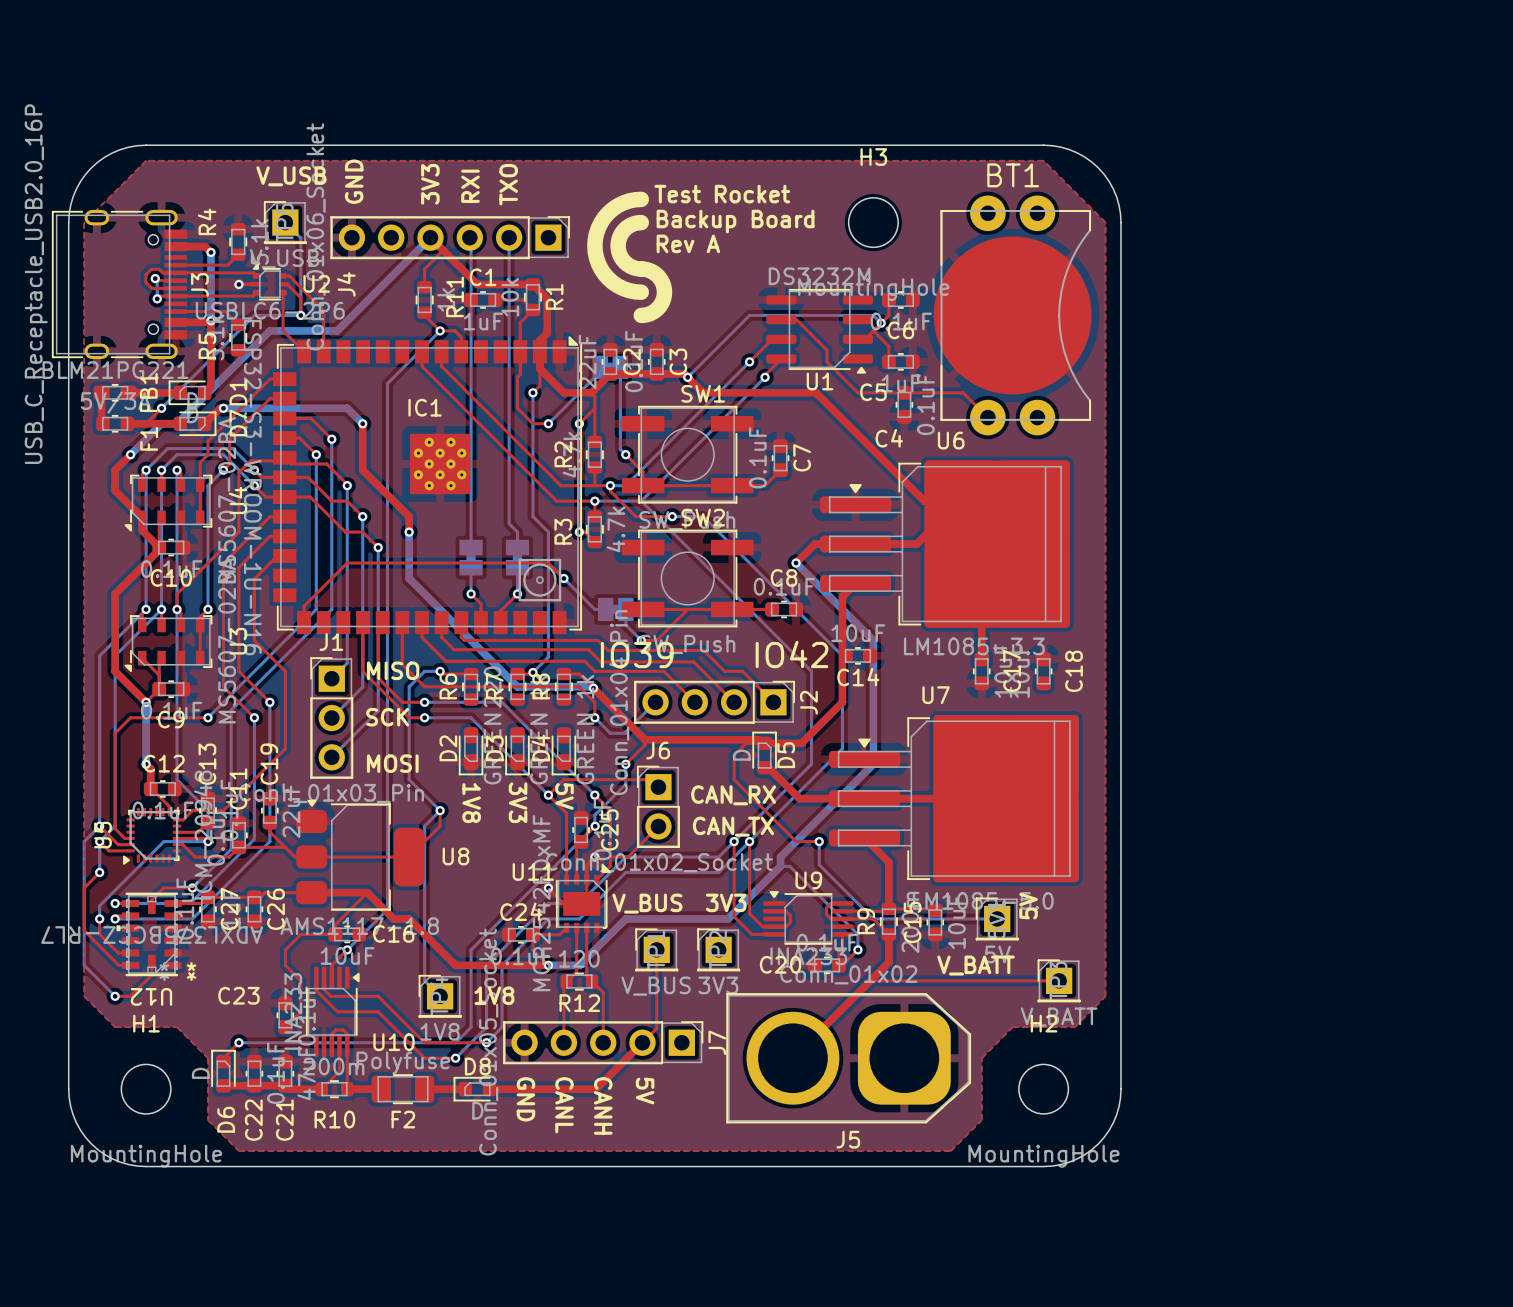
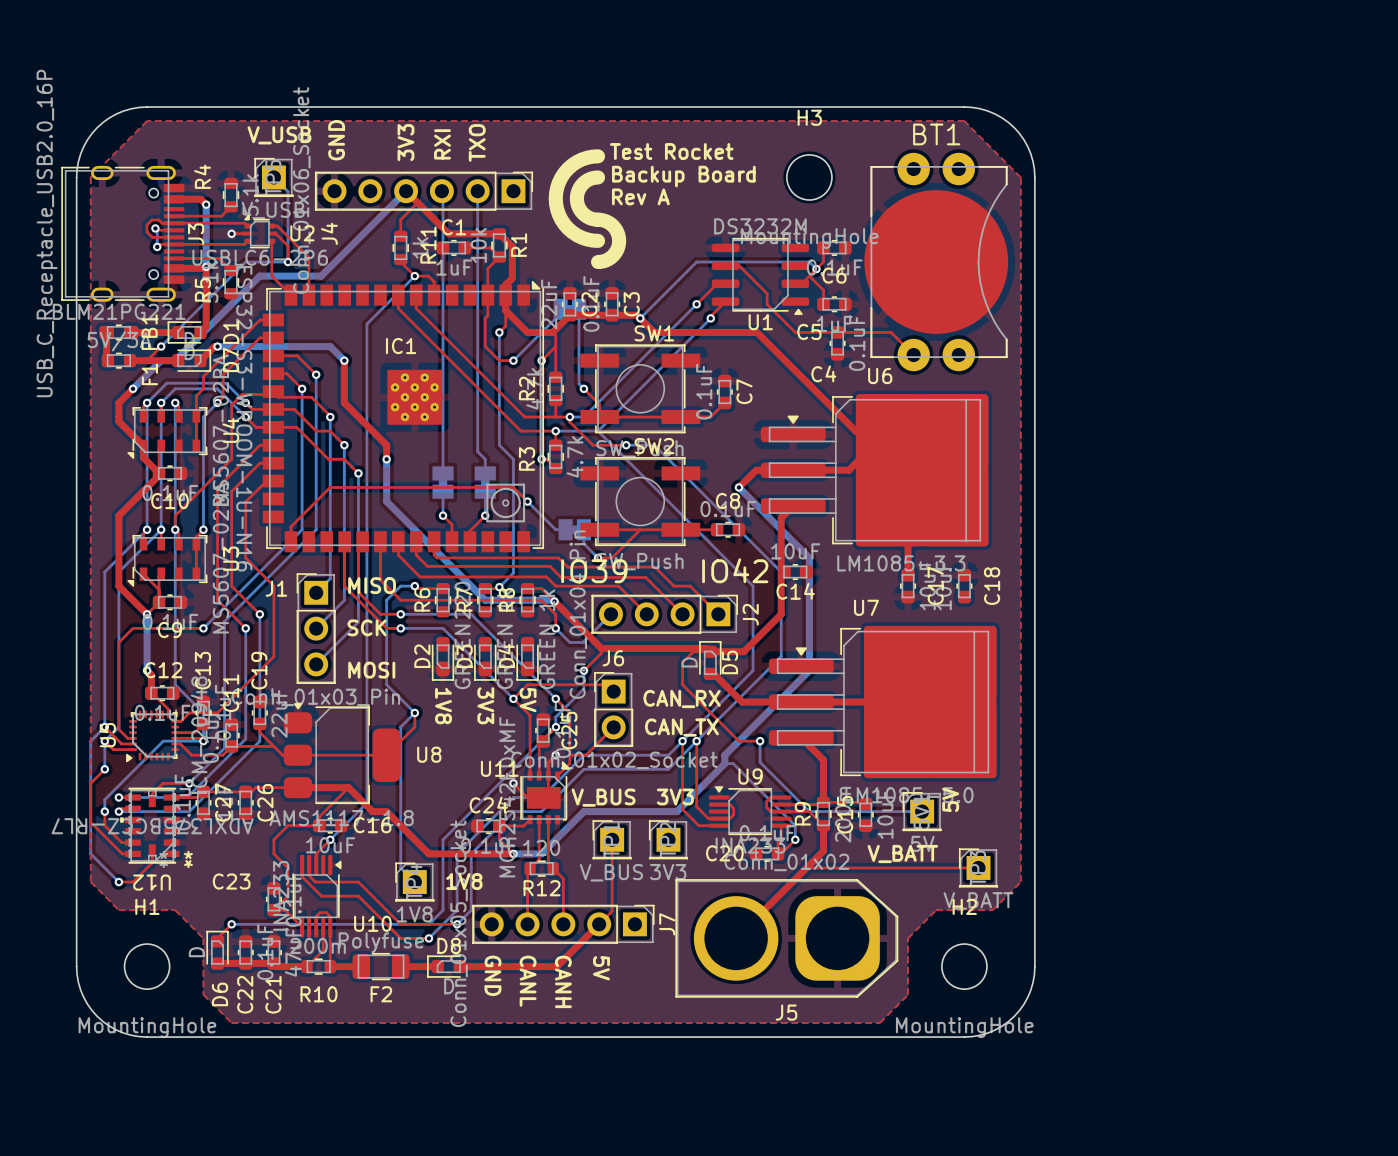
J1 name position: J1 (331, 642) -> J1 (276, 588)
top track: none -> (273, 910) (285, 910) (302, 927)

